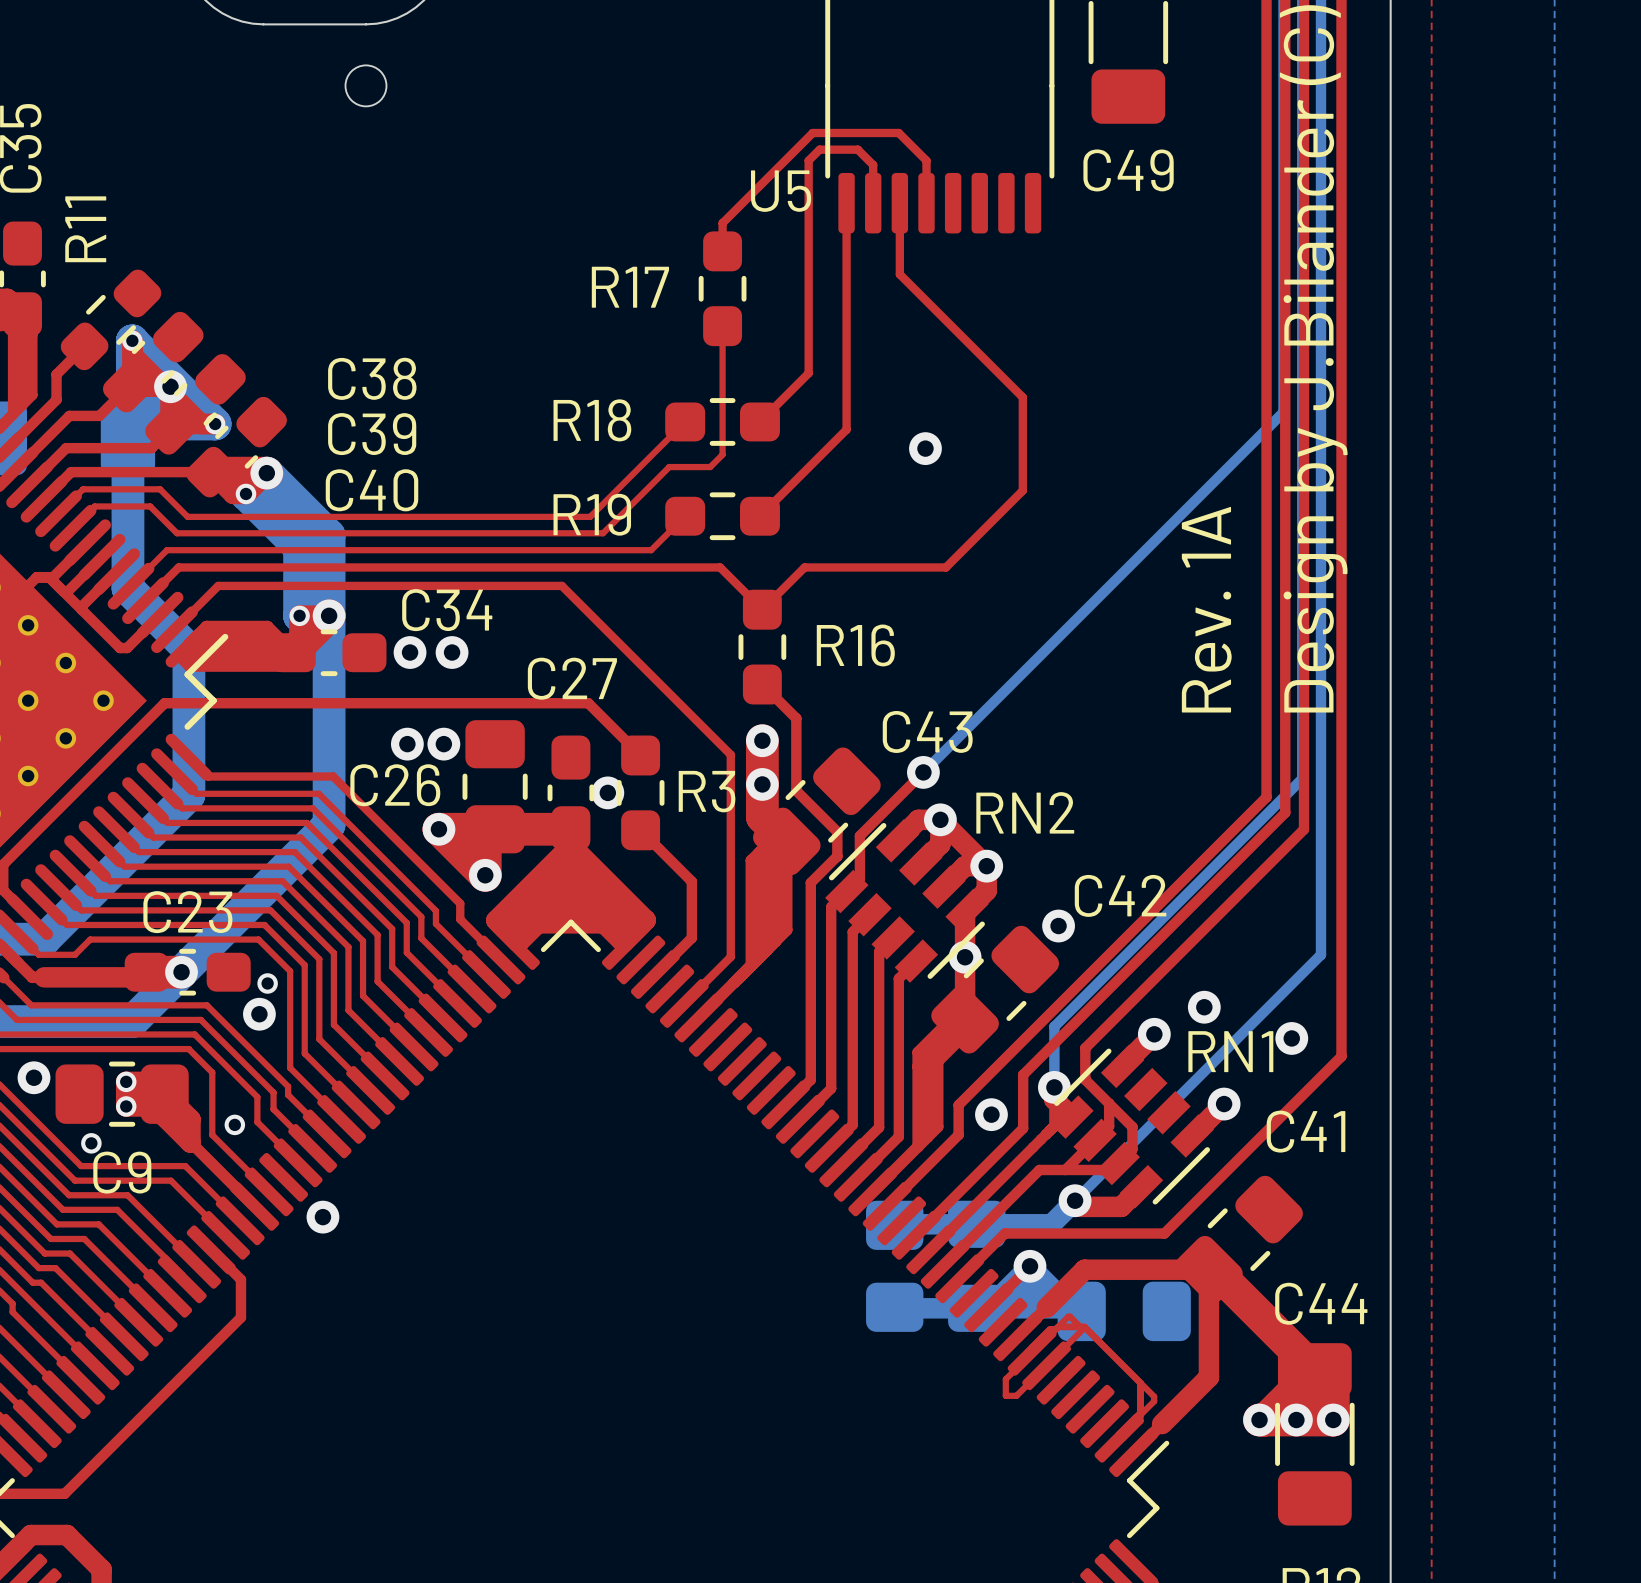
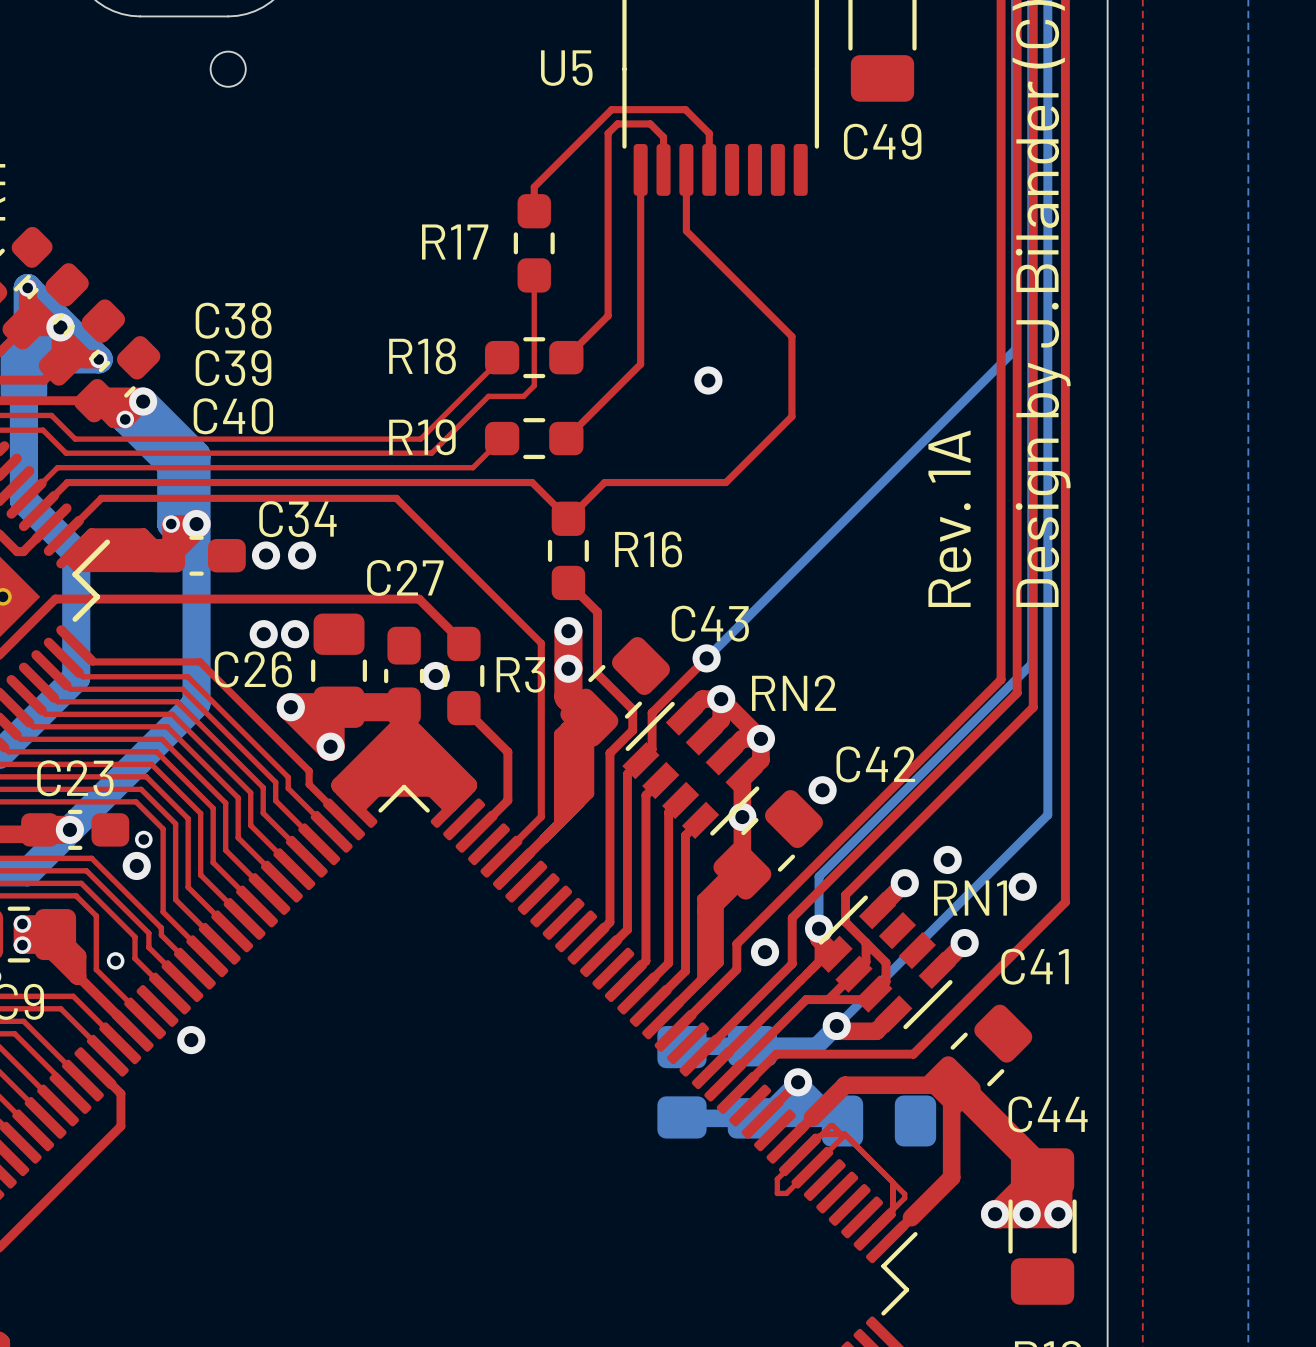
U5 name position: U5 (781, 191) -> U5 (566, 68)

